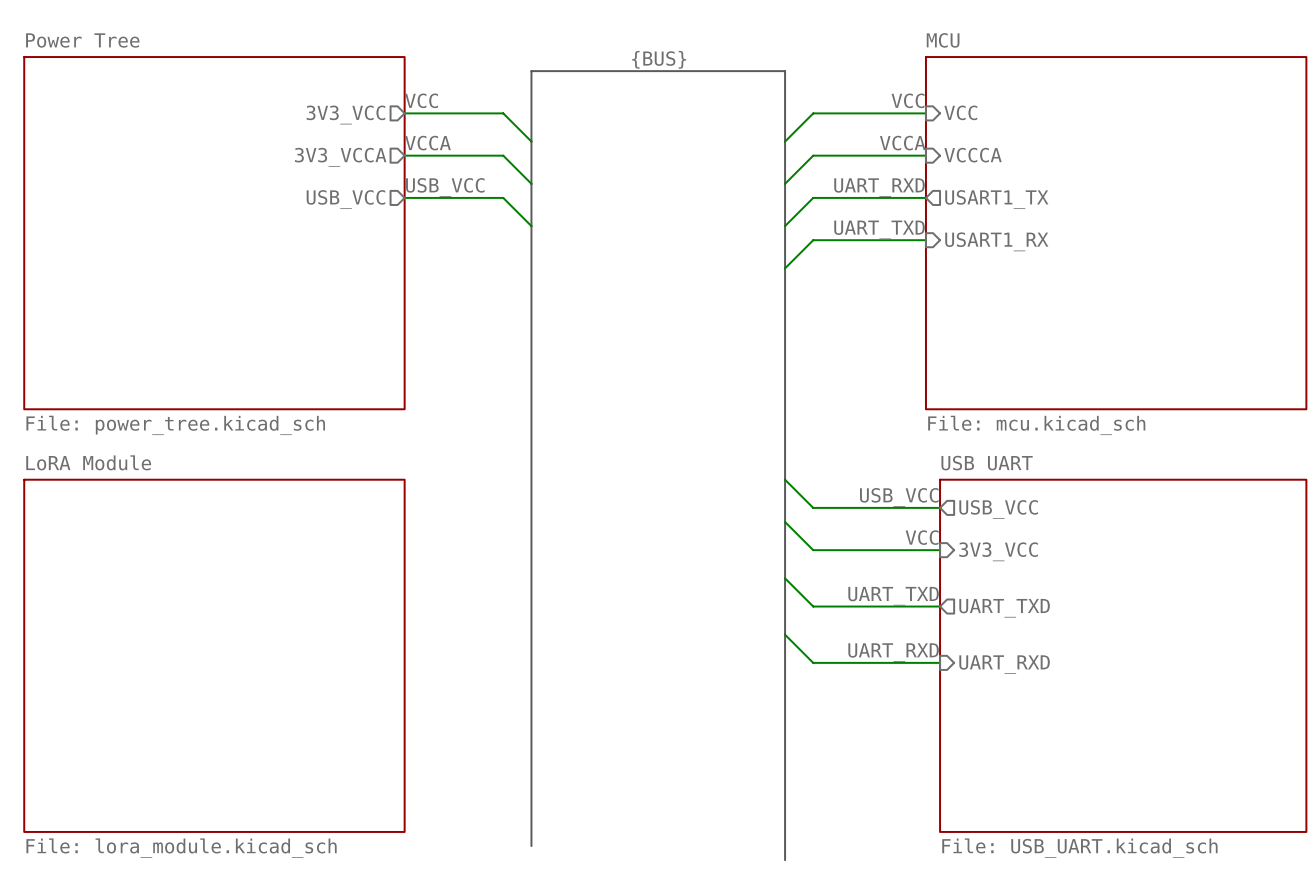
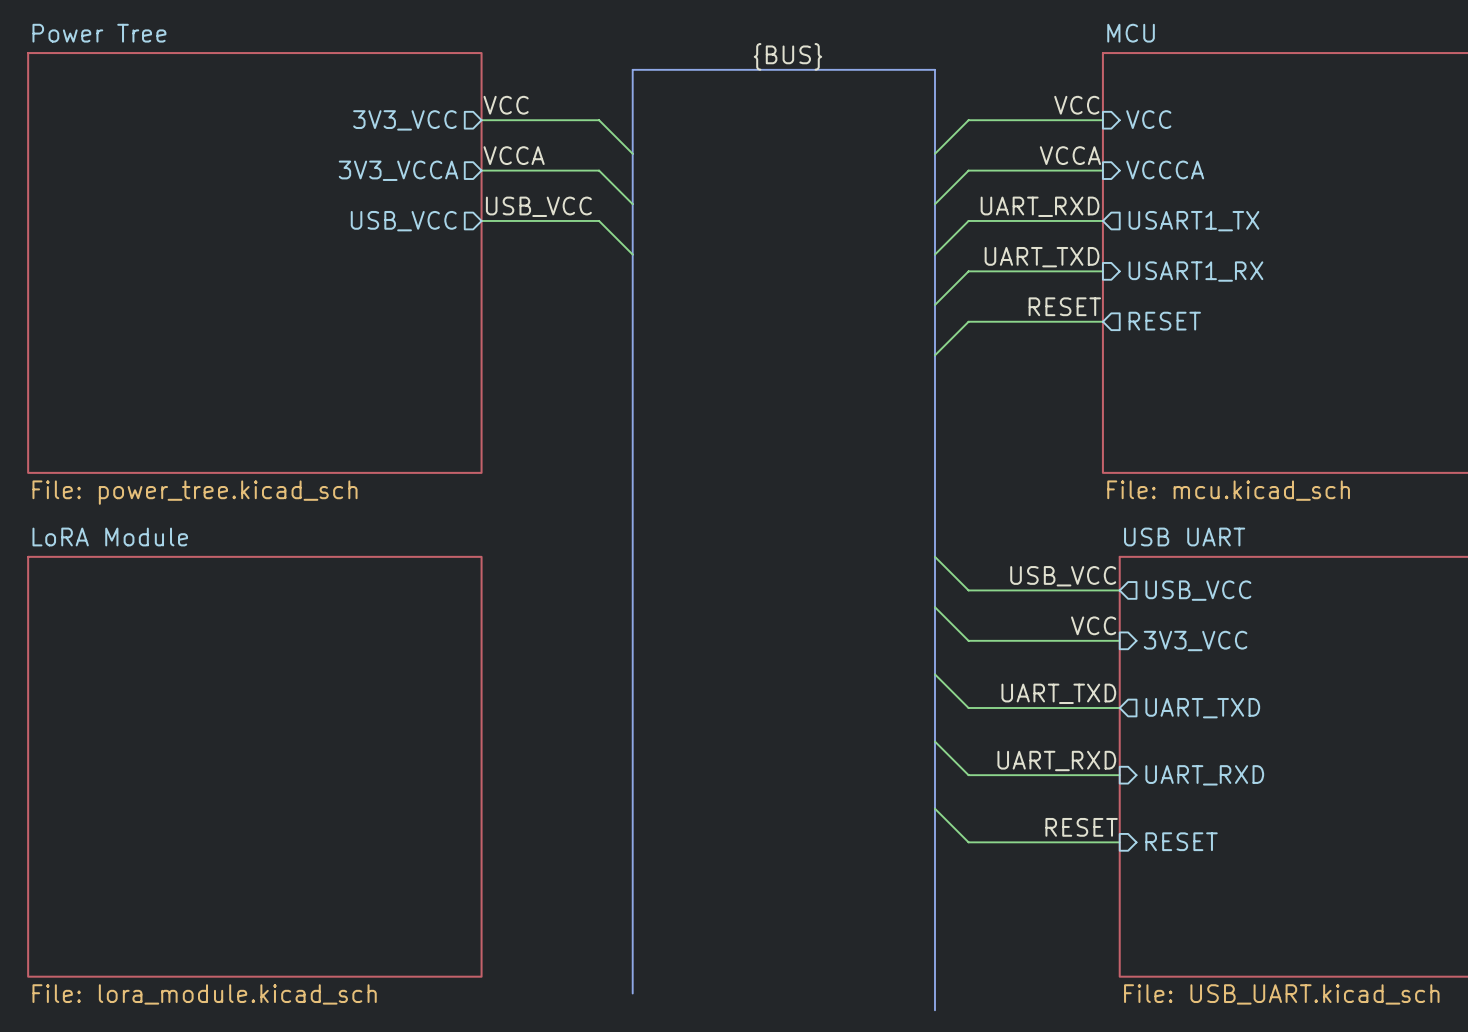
label: none -> RESET (1064, 306)
sheet pin: none -> RESET (1164, 321)
wire: none -> (1102, 321) (968, 321) (934, 355)
wire: none -> (934, 808) (968, 842) (1119, 842)
label: none -> RESET (1081, 827)
sheet pin: none -> RESET (1181, 841)

